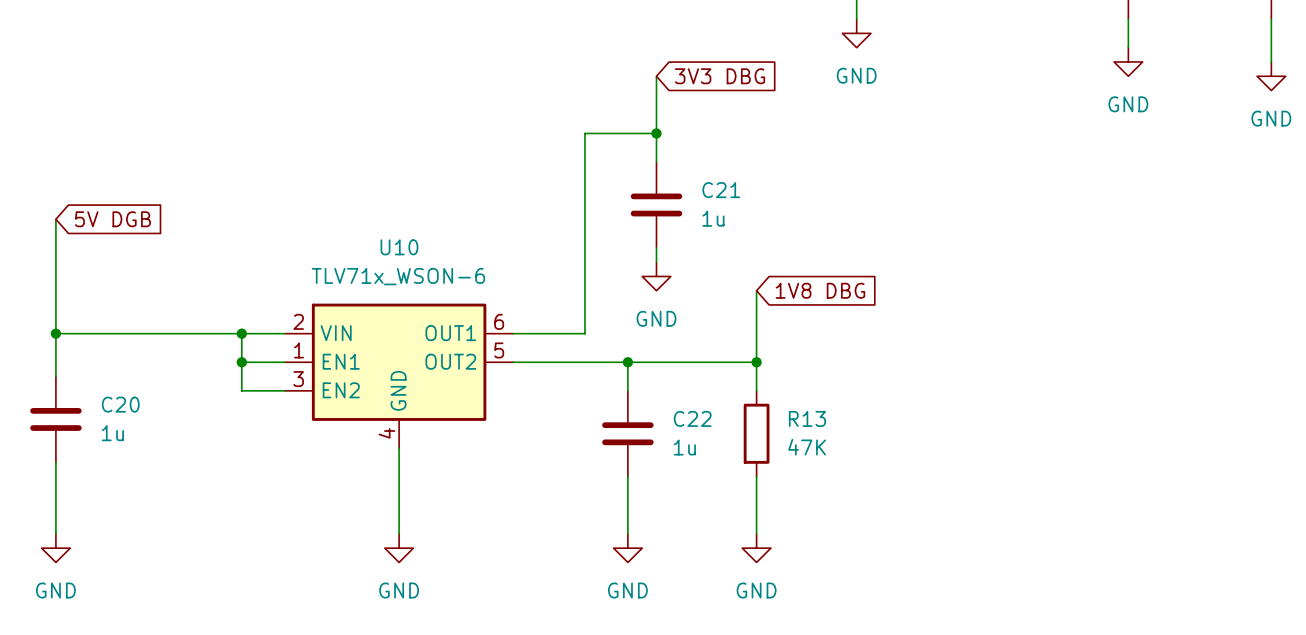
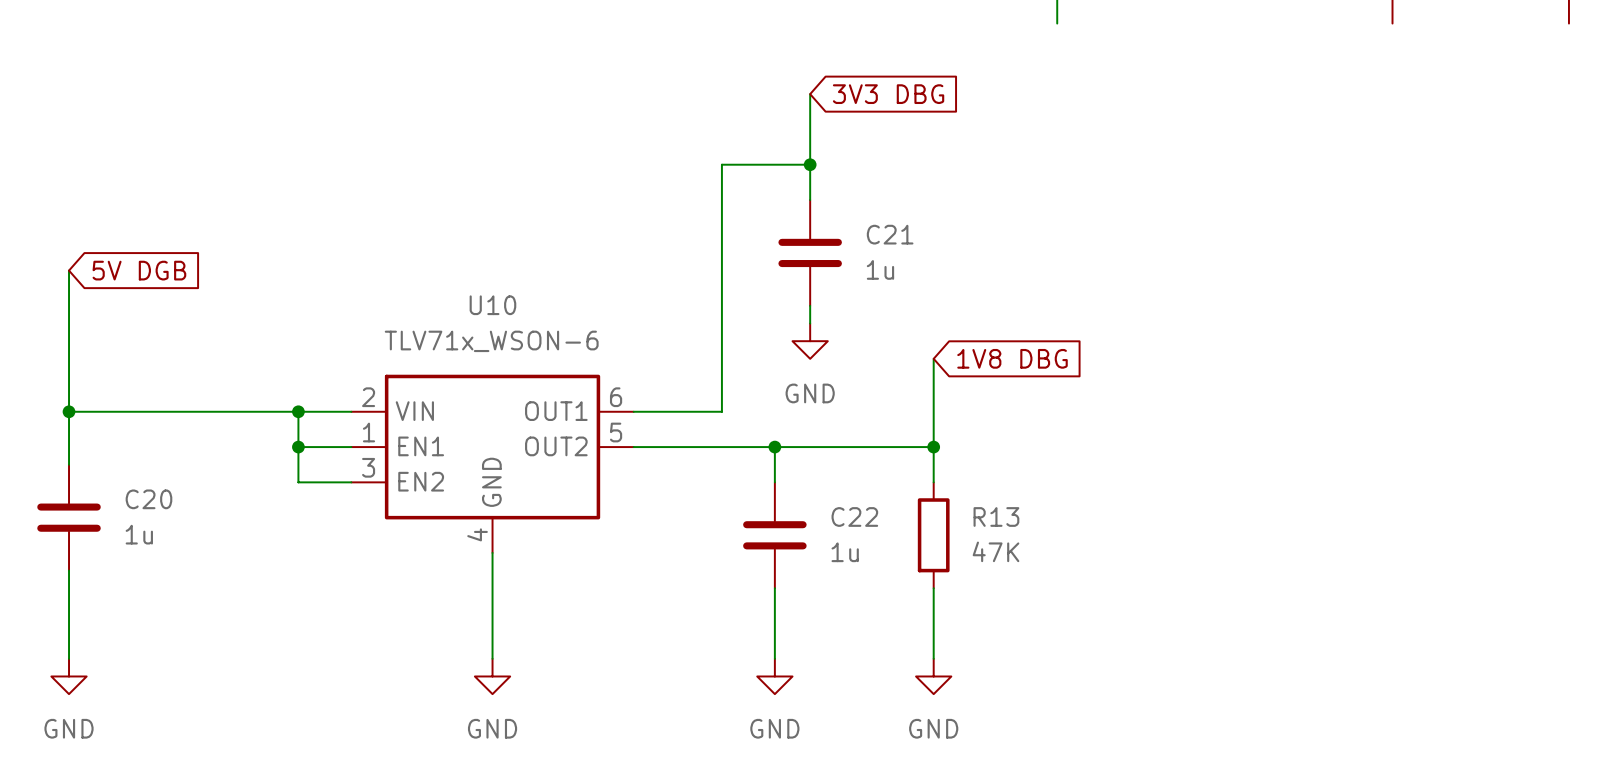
wire: (1128, 19) (1128, 47) -> none
wire: (1271, 19) (1271, 61) -> none
power symbol: GND (856, 33) -> none
power symbol: GND (1128, 61) -> none
power symbol: GND (1271, 76) -> none

